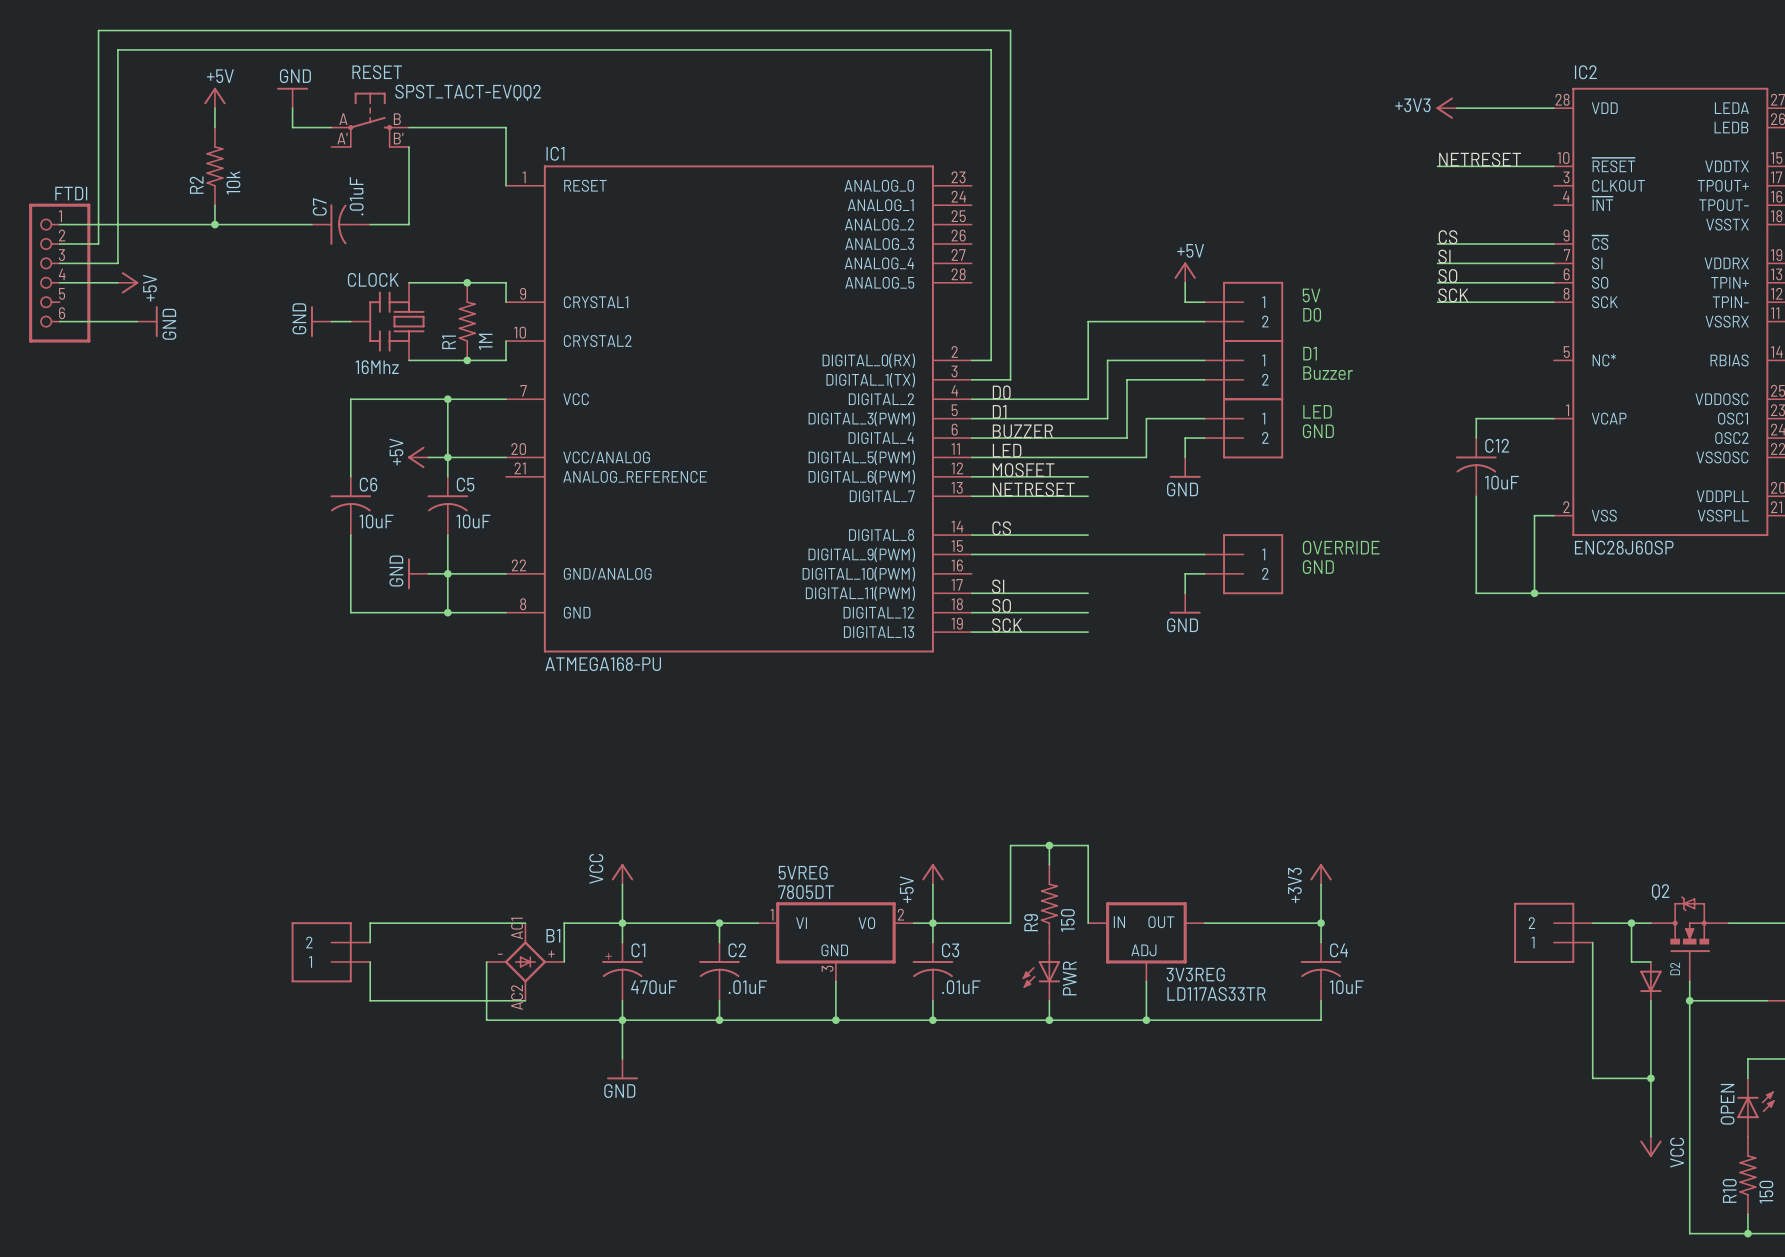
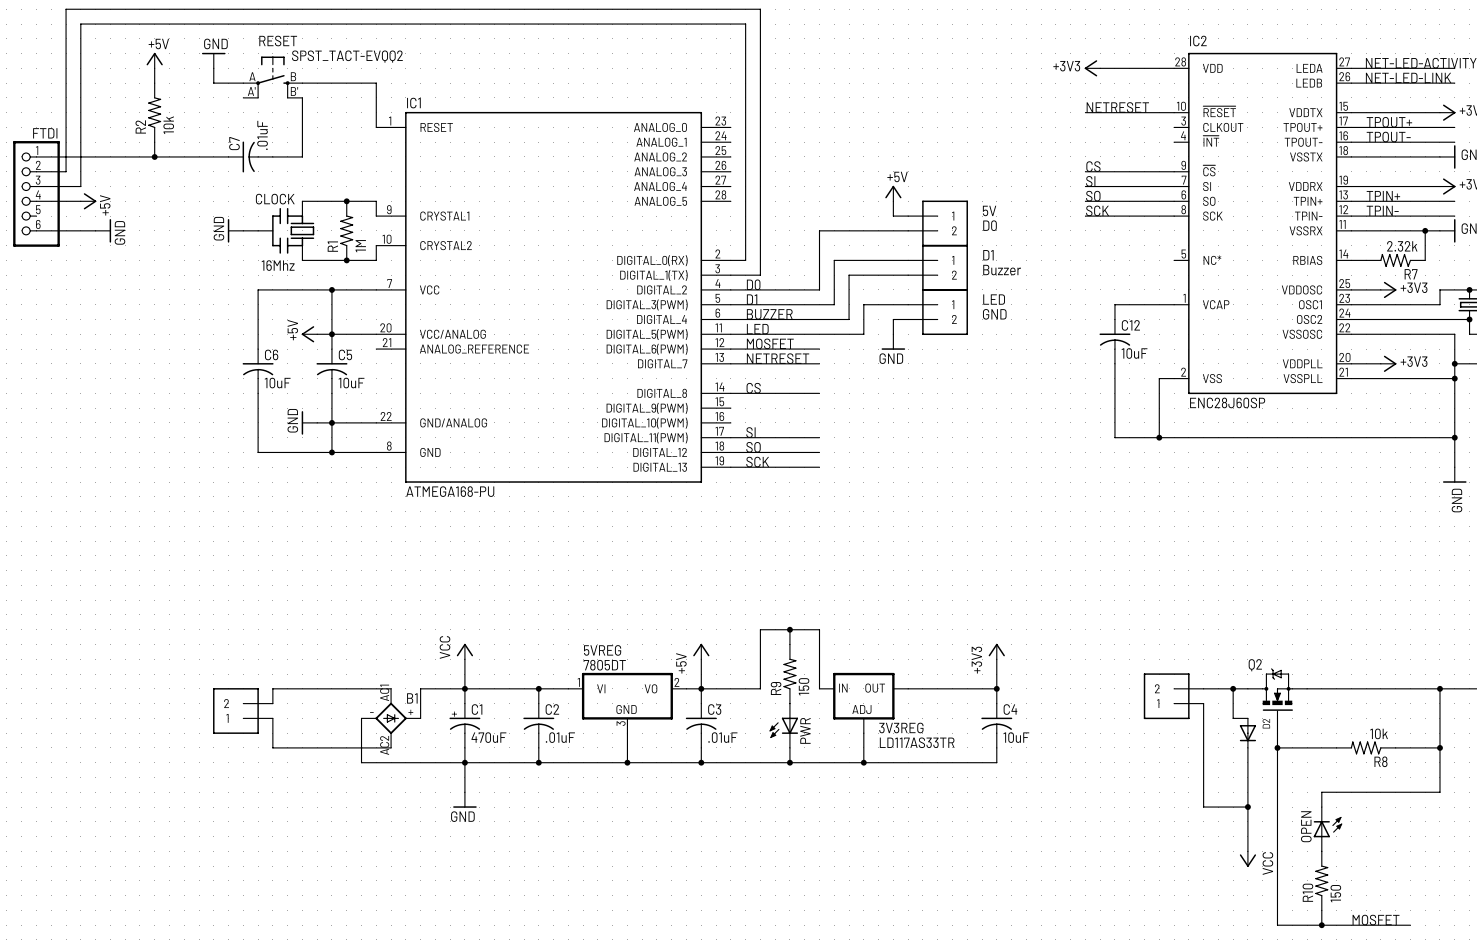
text: OVERRIDE (1341, 547) -> none
wire: (971, 554) (1204, 554) -> none
part: (1243, 564) -> none
text: GND (1318, 567) -> none
wire: (1204, 573) (1185, 573) (1185, 593) -> none
power symbol: GND (1185, 603) -> none

